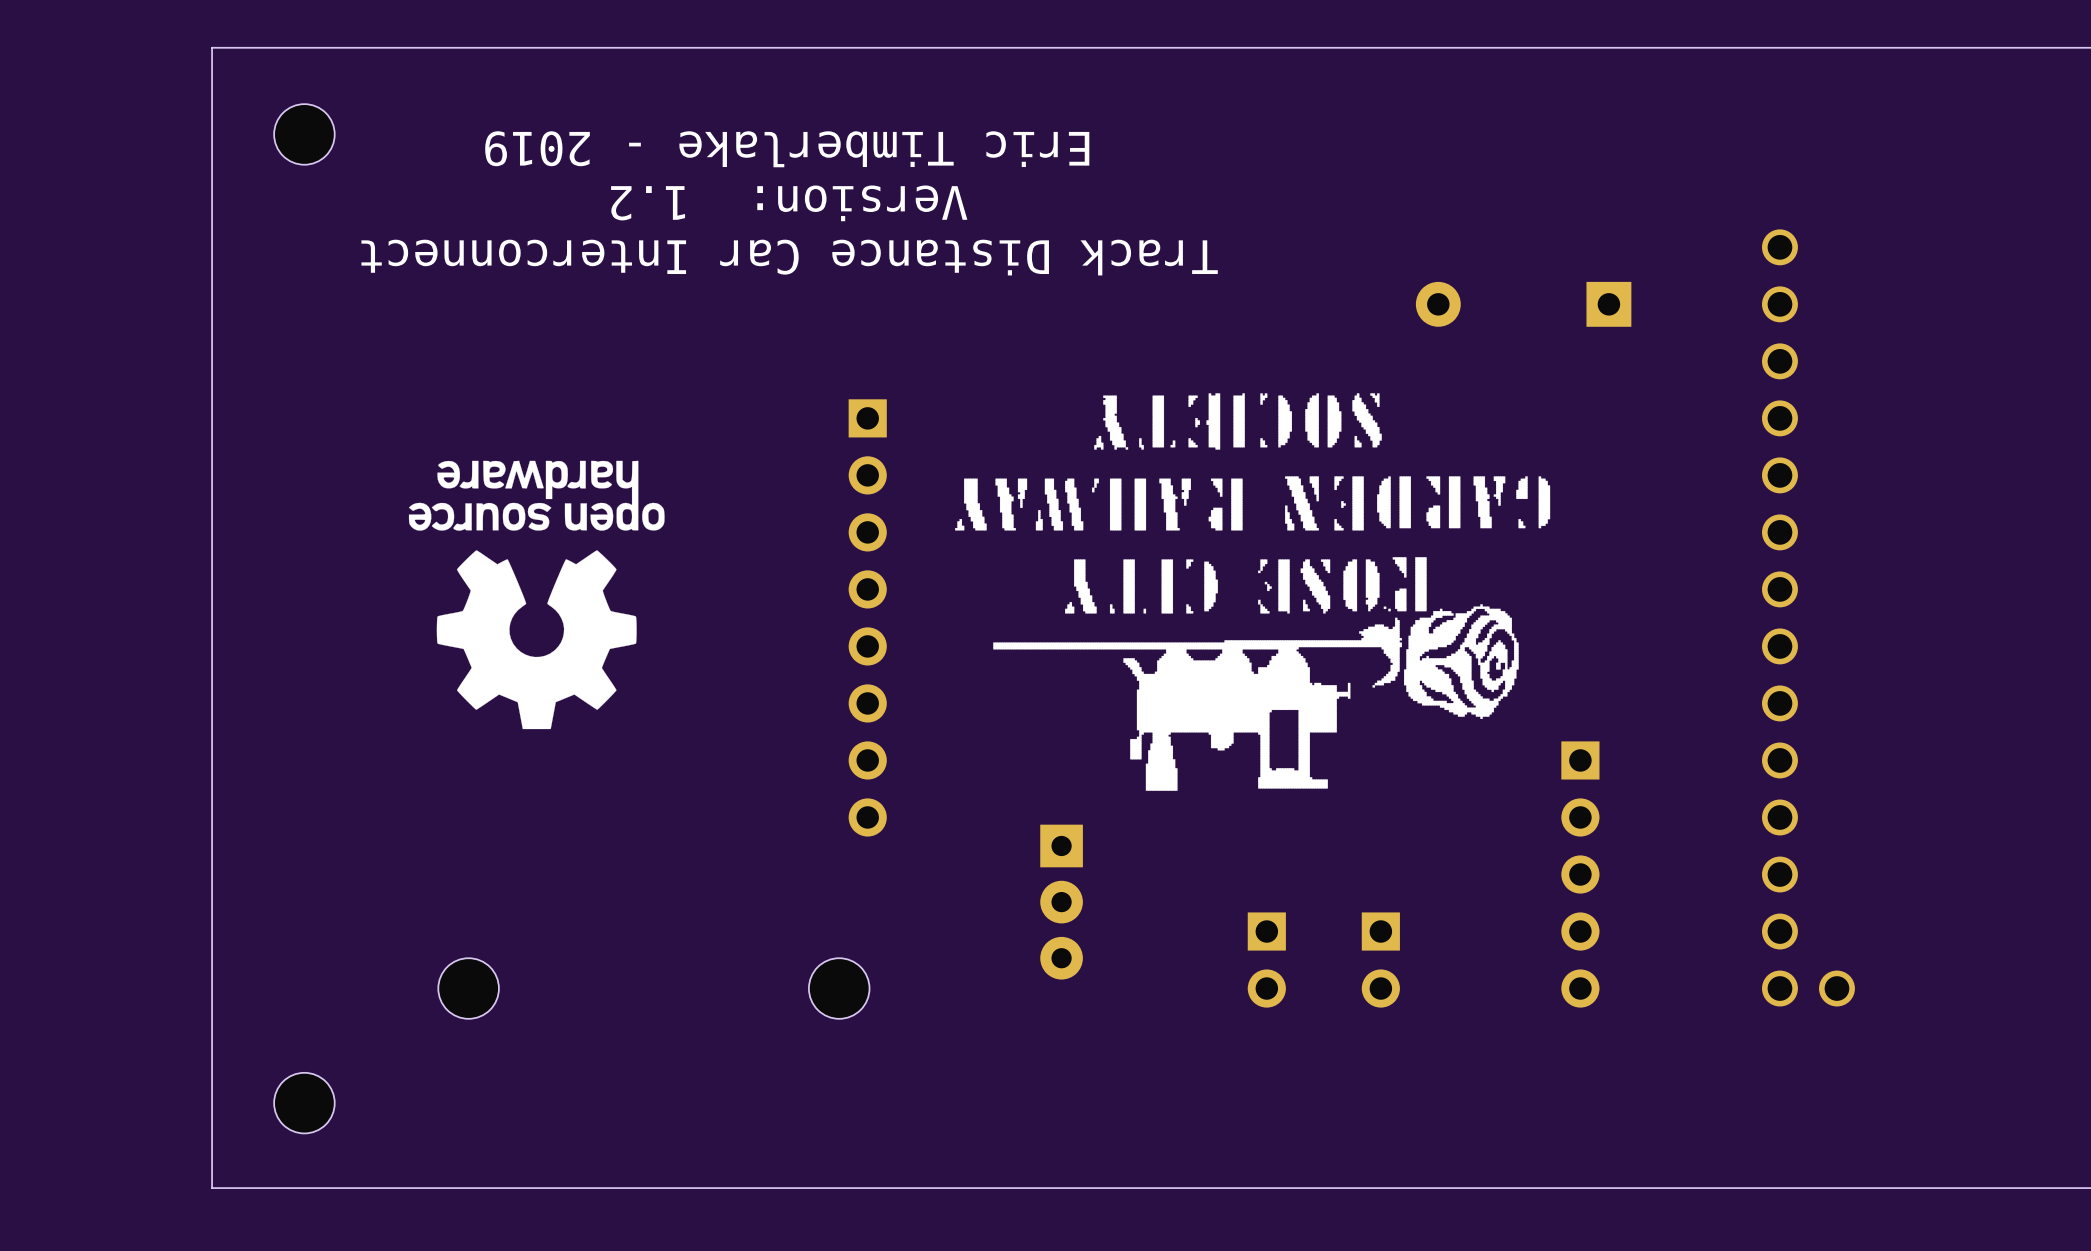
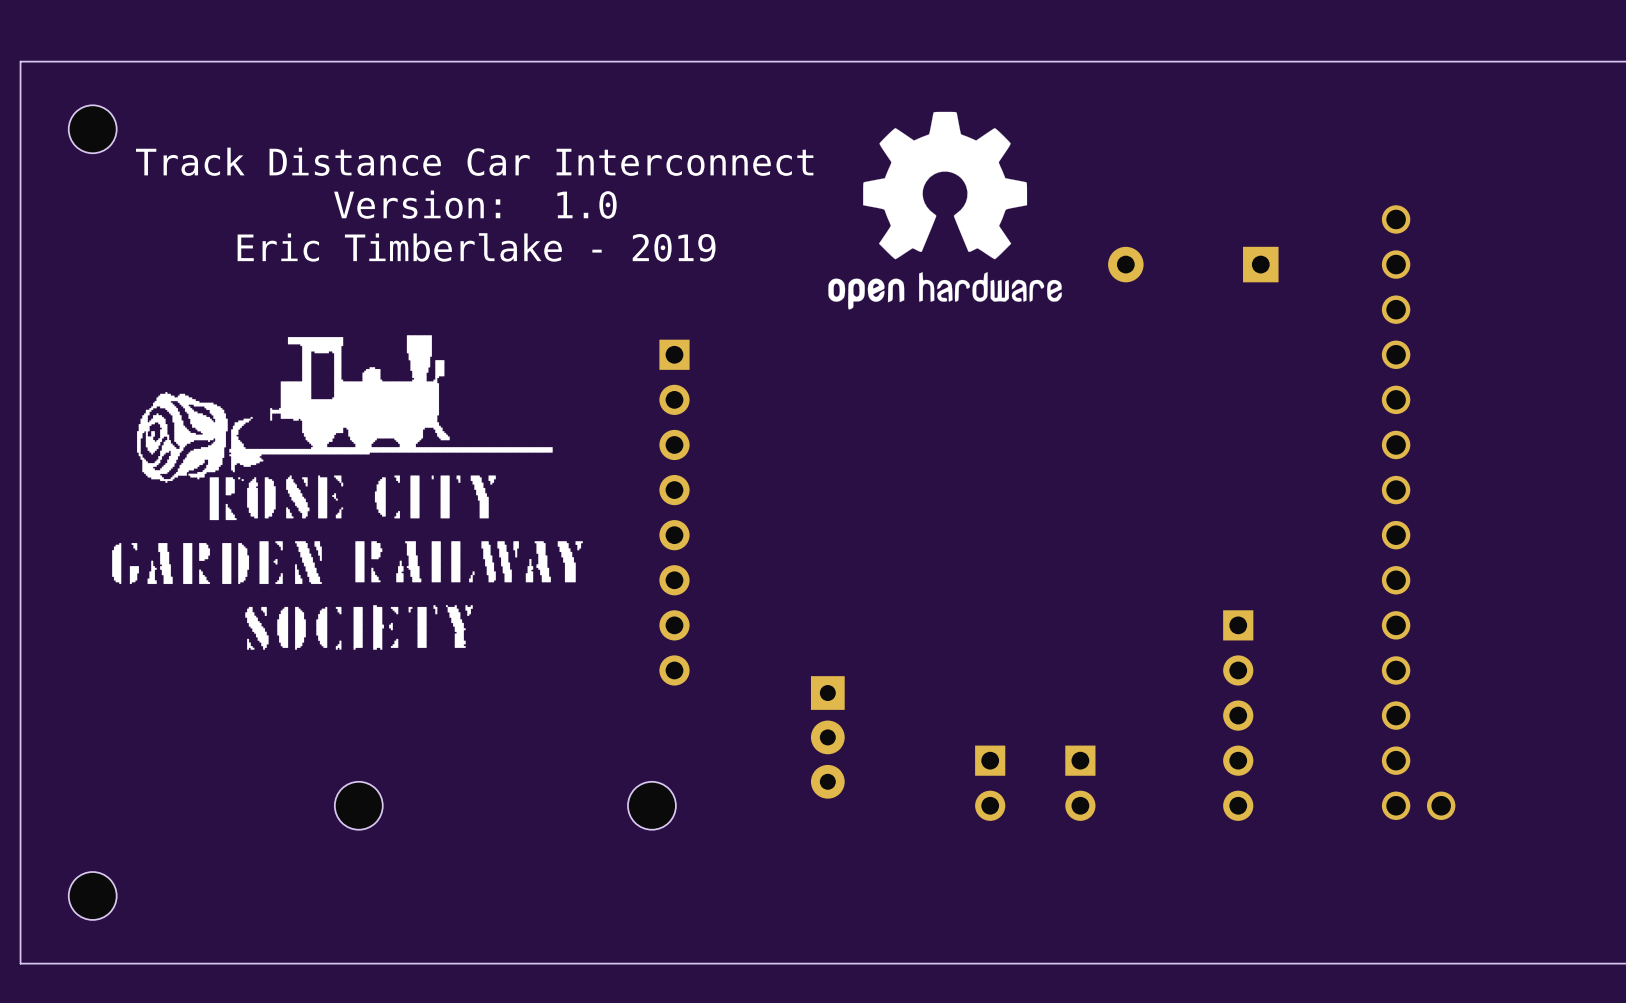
board edge: (212, 47) (212, 1188) -> (155, 61) (20, 61) (20, 963) (155, 963)
drawing: none -> [828, 111, 1062, 310]
part position: (304, 134) -> (92, 129)
text rotation: 0° (787, 149) -> 180° (476, 247)
text: Version: 1.2 (789, 203) -> Version: 1.0 (475, 204)
text rotation: 0° (789, 257) -> 180° (474, 161)
drawing: none -> [112, 335, 583, 650]
drawing: [955, 393, 1551, 791] -> none
drawing: [408, 460, 665, 730] -> none
part position: (304, 1103) -> (92, 895)

